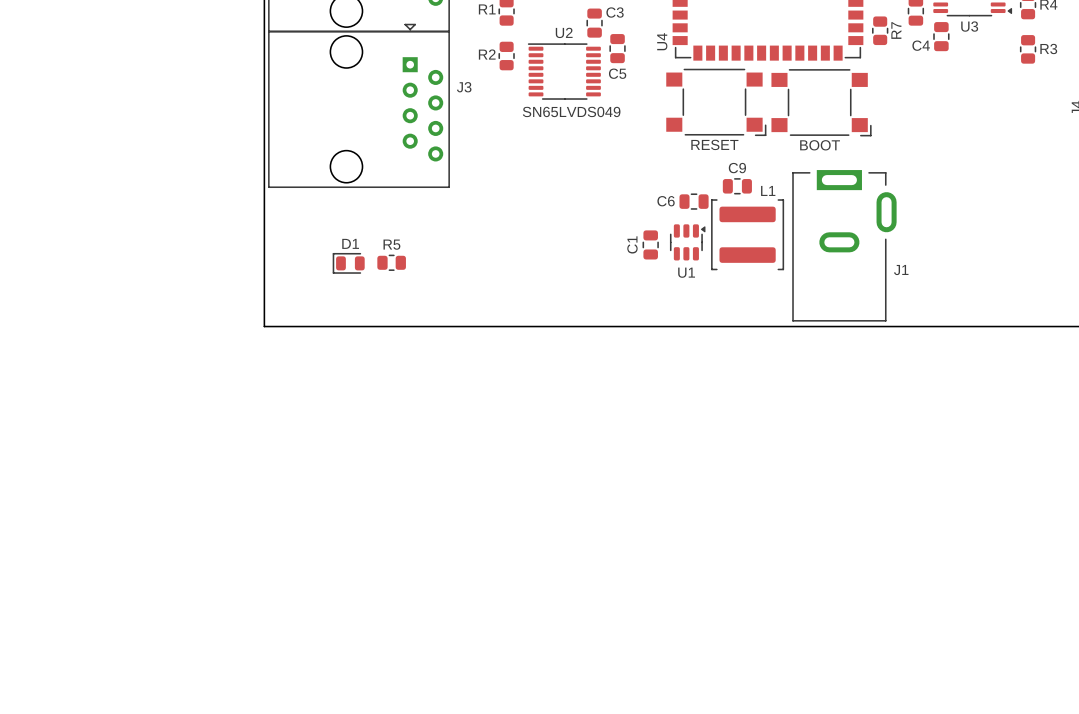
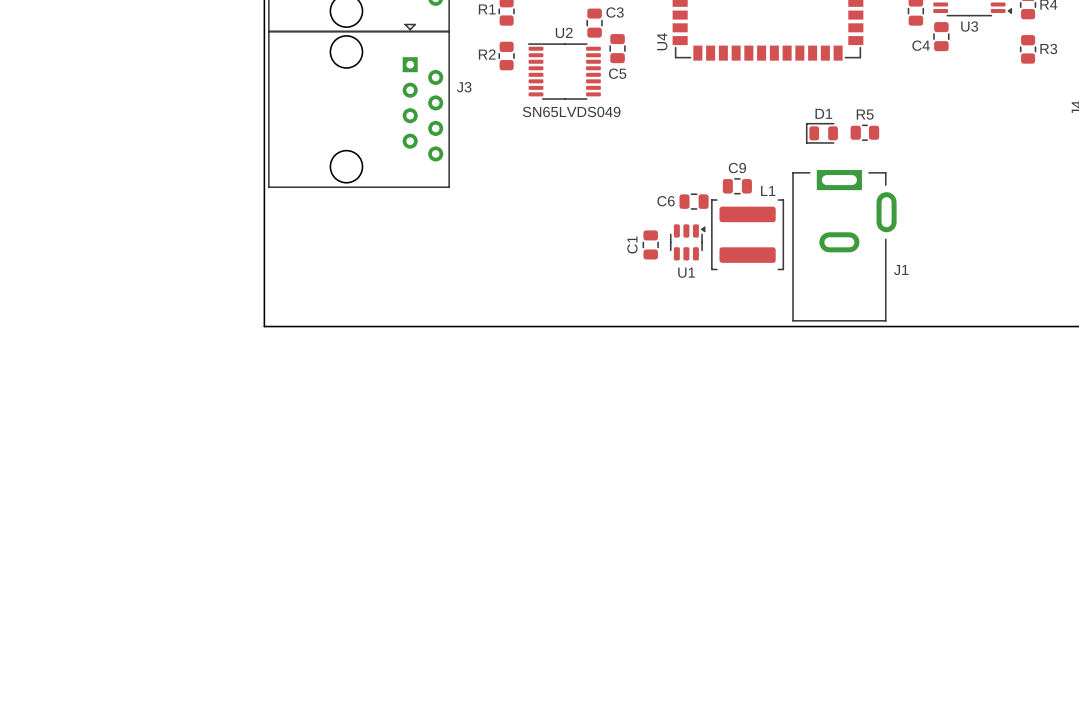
R7: (880, 30) -> none
RESET: (716, 102) -> none
BOOT: (821, 102) -> none
R5 position: (391, 262) -> (864, 132)
D1 position: (348, 263) -> (822, 133)

